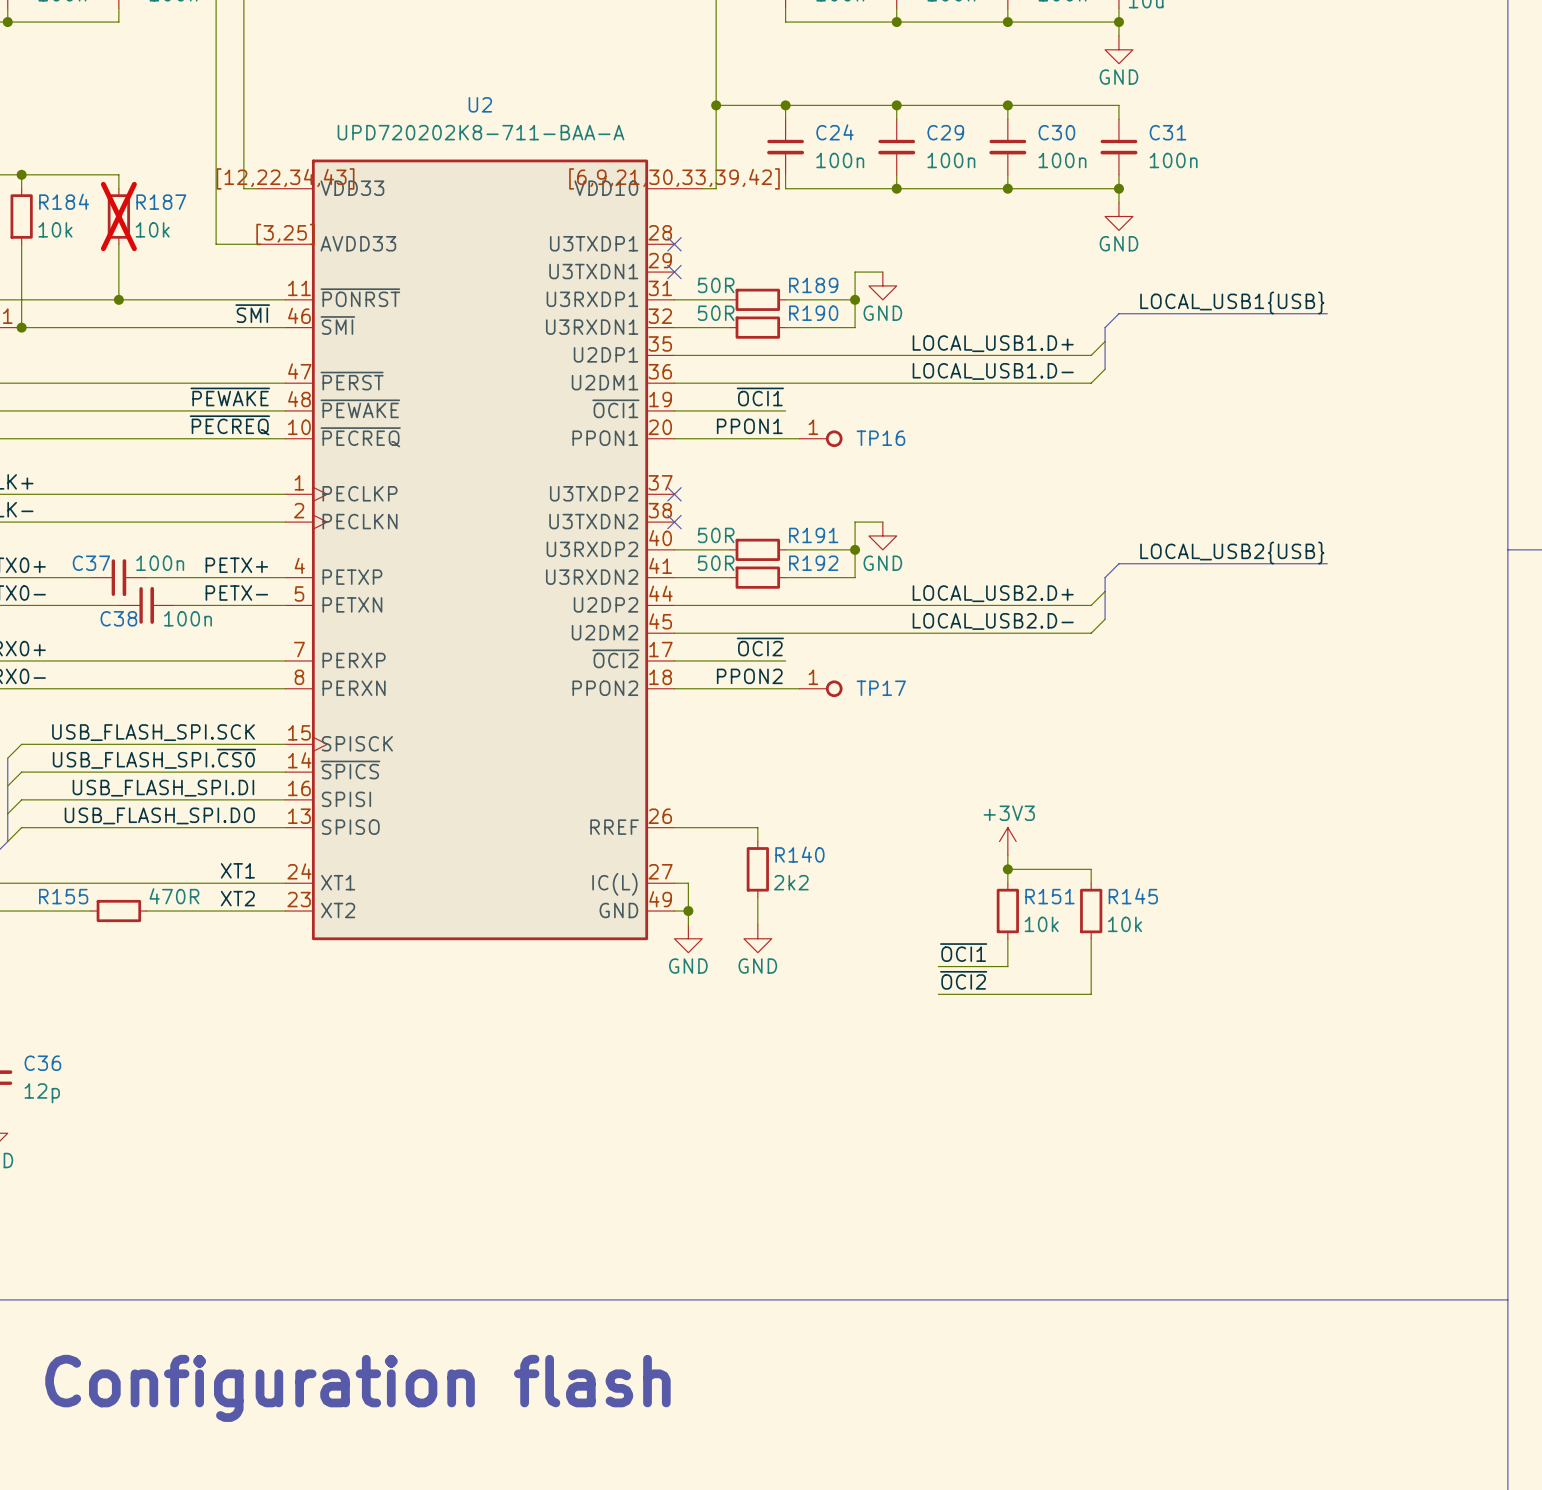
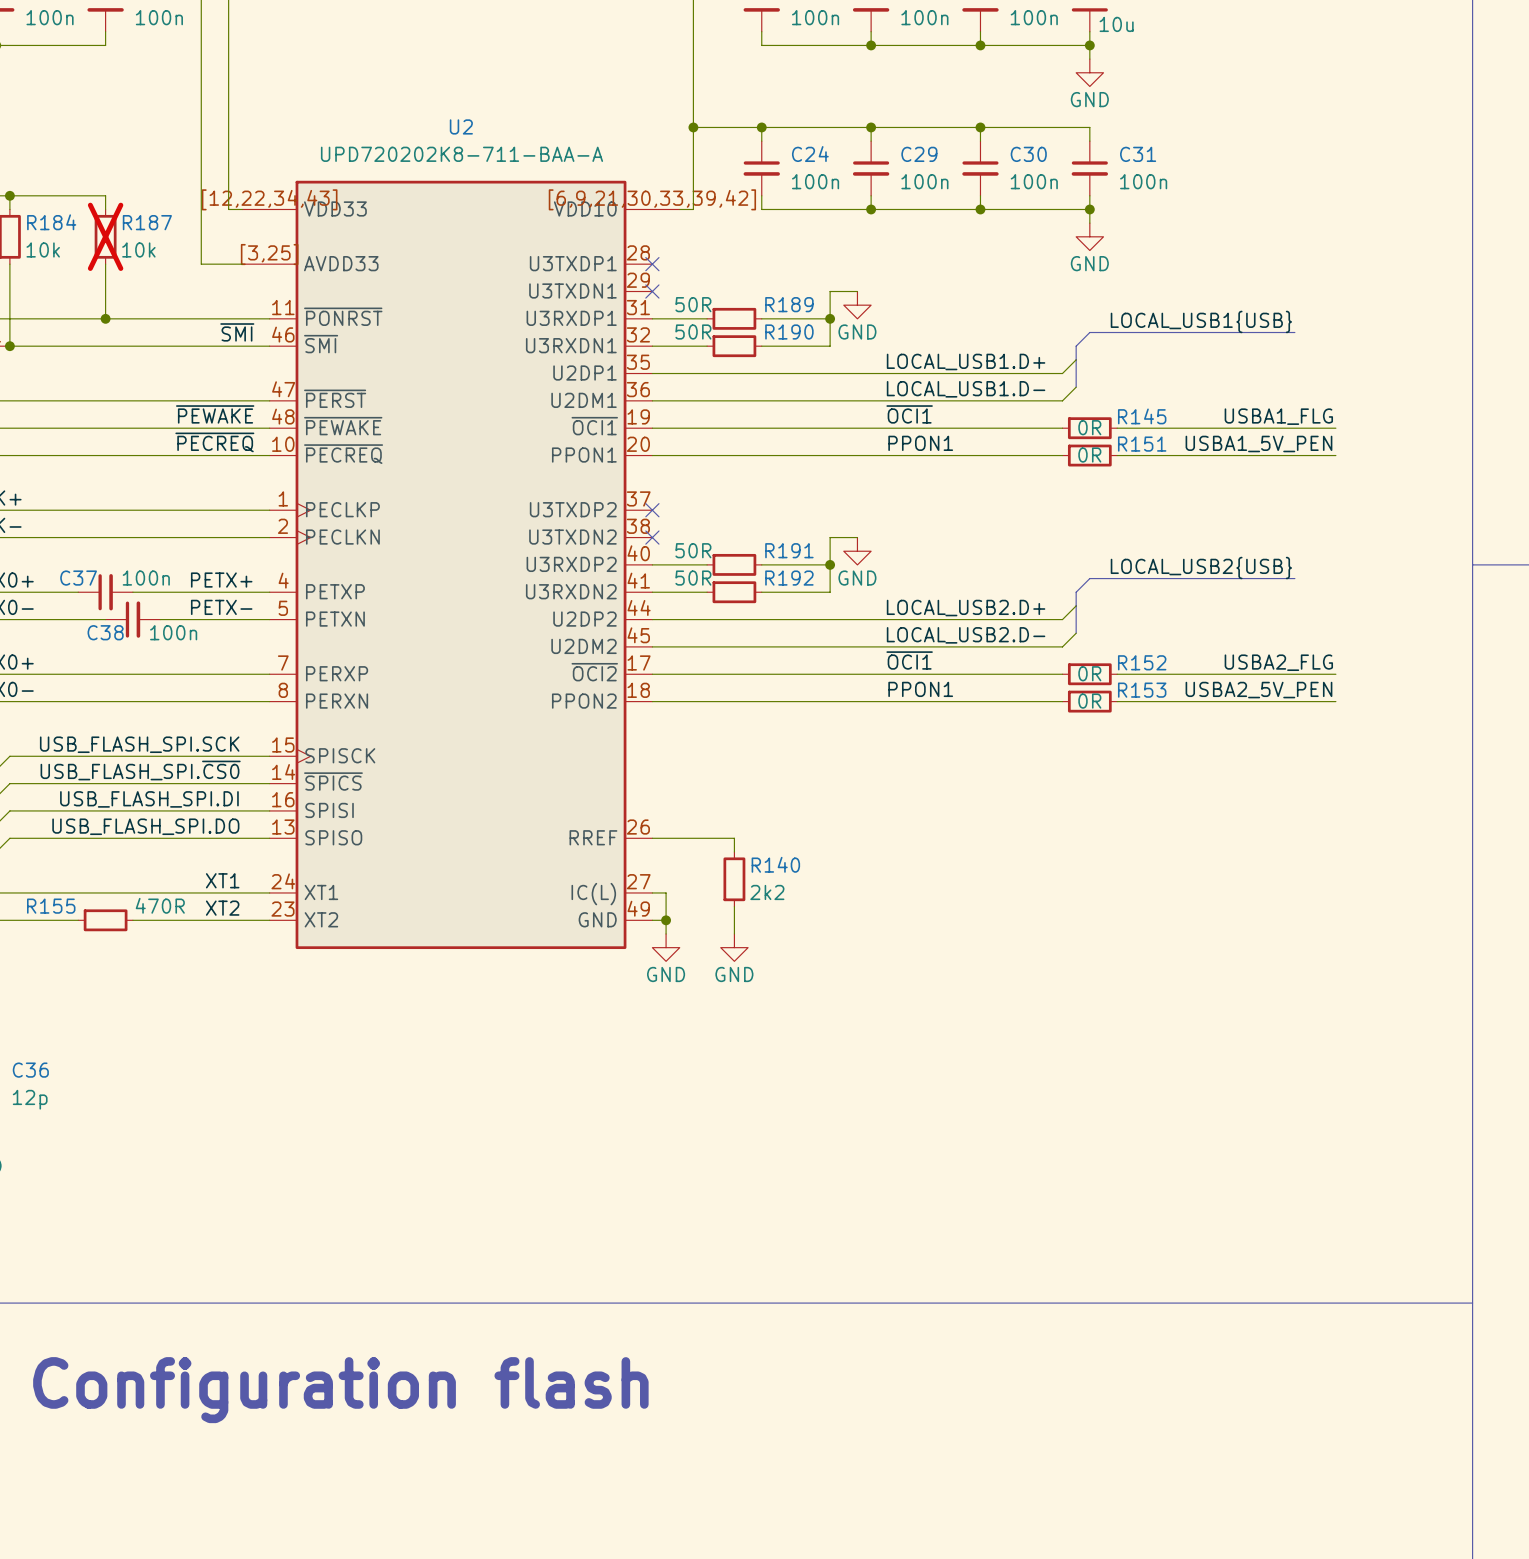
label position: ~{OCI1} (760, 396) -> ~{OCI1} (909, 414)
label: none -> USBA1_FLG (1278, 416)
wire: none -> (761, 428) (1062, 428)
wire: none -> (1117, 428) (1335, 428)
label position: PPON1 (749, 426) -> PPON1 (920, 443)
label: none -> USBA1_5V_PEN (1258, 443)
wire: none -> (775, 455) (1062, 455)
TP16: (821, 438) -> none
wire: none -> (1117, 455) (1335, 455)
label: ~{OCI2} (760, 646) -> none
label: none -> ~{OCI1} (909, 660)
label: none -> USBA2_FLG (1278, 662)
wire: none -> (761, 674) (1062, 674)
R152: none -> (1089, 674)
wire: none -> (1117, 674) (1335, 674)
label: PPON2 (749, 676) -> none
label: none -> PPON1 (920, 689)
label: none -> USBA2_5V_PEN (1258, 690)
wire: none -> (775, 701) (1062, 701)
TP17: (821, 688) -> none
R153: none -> (1089, 701)
wire: none -> (1117, 701) (1335, 701)
power symbol: +3V3 (1007, 841) -> none
wire: (1007, 855) (1007, 883) -> none
wire: (1007, 869) (1091, 869) (1091, 883) -> none
junction: (1007, 869) -> none
R151 rotation: 0° (1007, 911) -> 90° clockwise (1089, 455)
R151 position: (1007, 911) -> (1089, 455)
R145 rotation: 0° (1091, 911) -> 90° clockwise (1089, 428)
R145 position: (1091, 911) -> (1089, 428)
R151 text: 10k (1041, 924) -> 0R (1089, 455)
R145 text: 10k (1125, 924) -> 0R (1089, 427)
wire: (1007, 938) (1007, 966) (938, 966) -> none
wire: (1091, 938) (1091, 994) (938, 994) -> none
label: ~{OCI1} (963, 952) -> none
label: ~{OCI2} (963, 980) -> none

